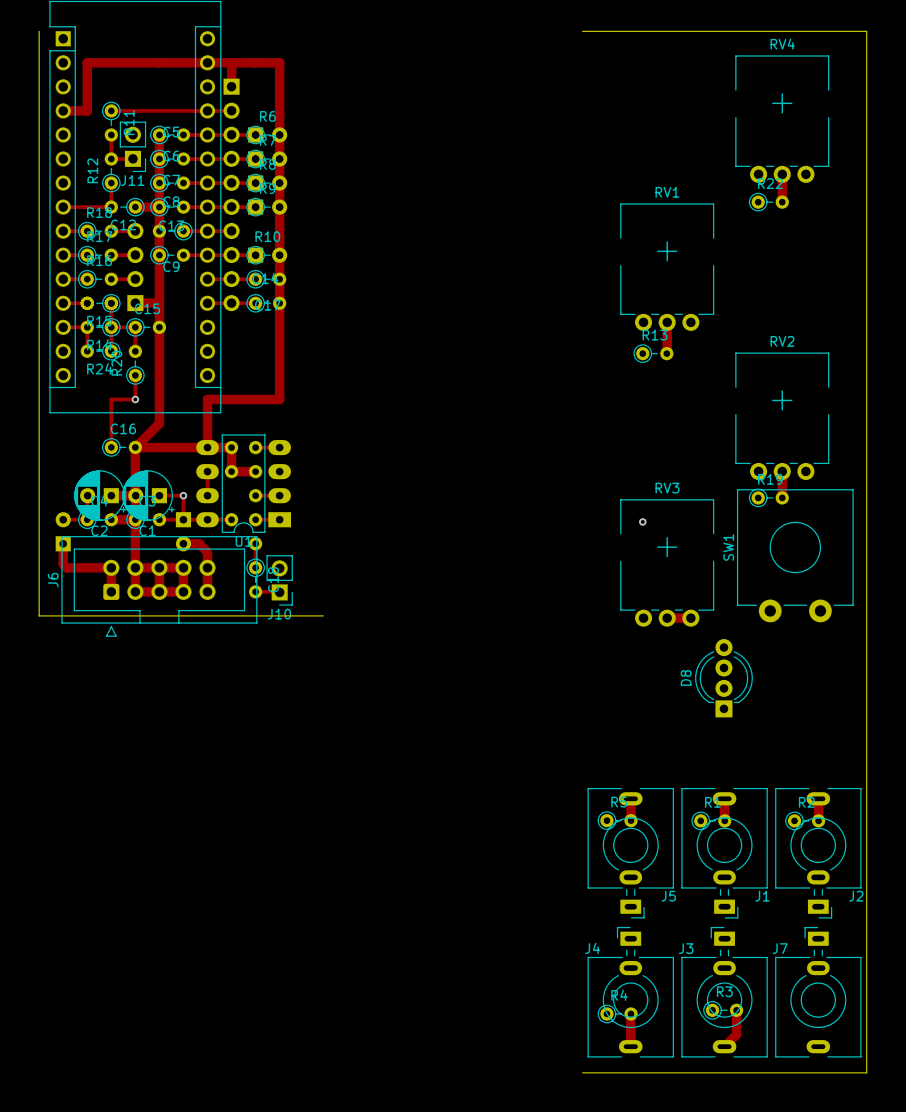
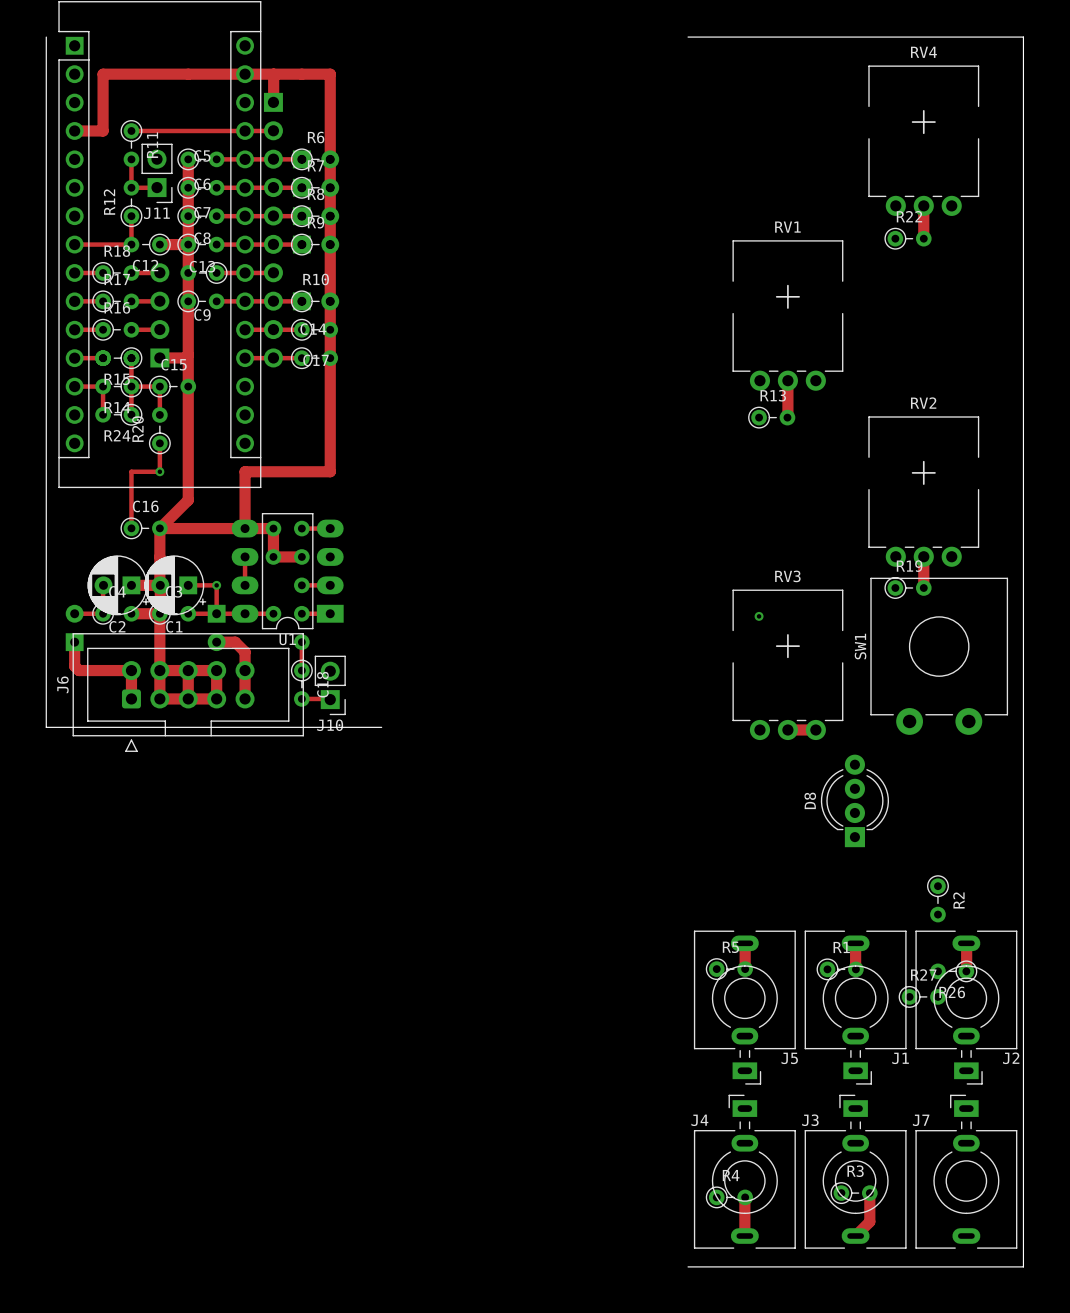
R2 rotation: 0° (805, 820) -> 90° clockwise (937, 898)
R2 position: (805, 820) -> (937, 898)
R26: none -> (953, 971)
R27: none -> (922, 996)

